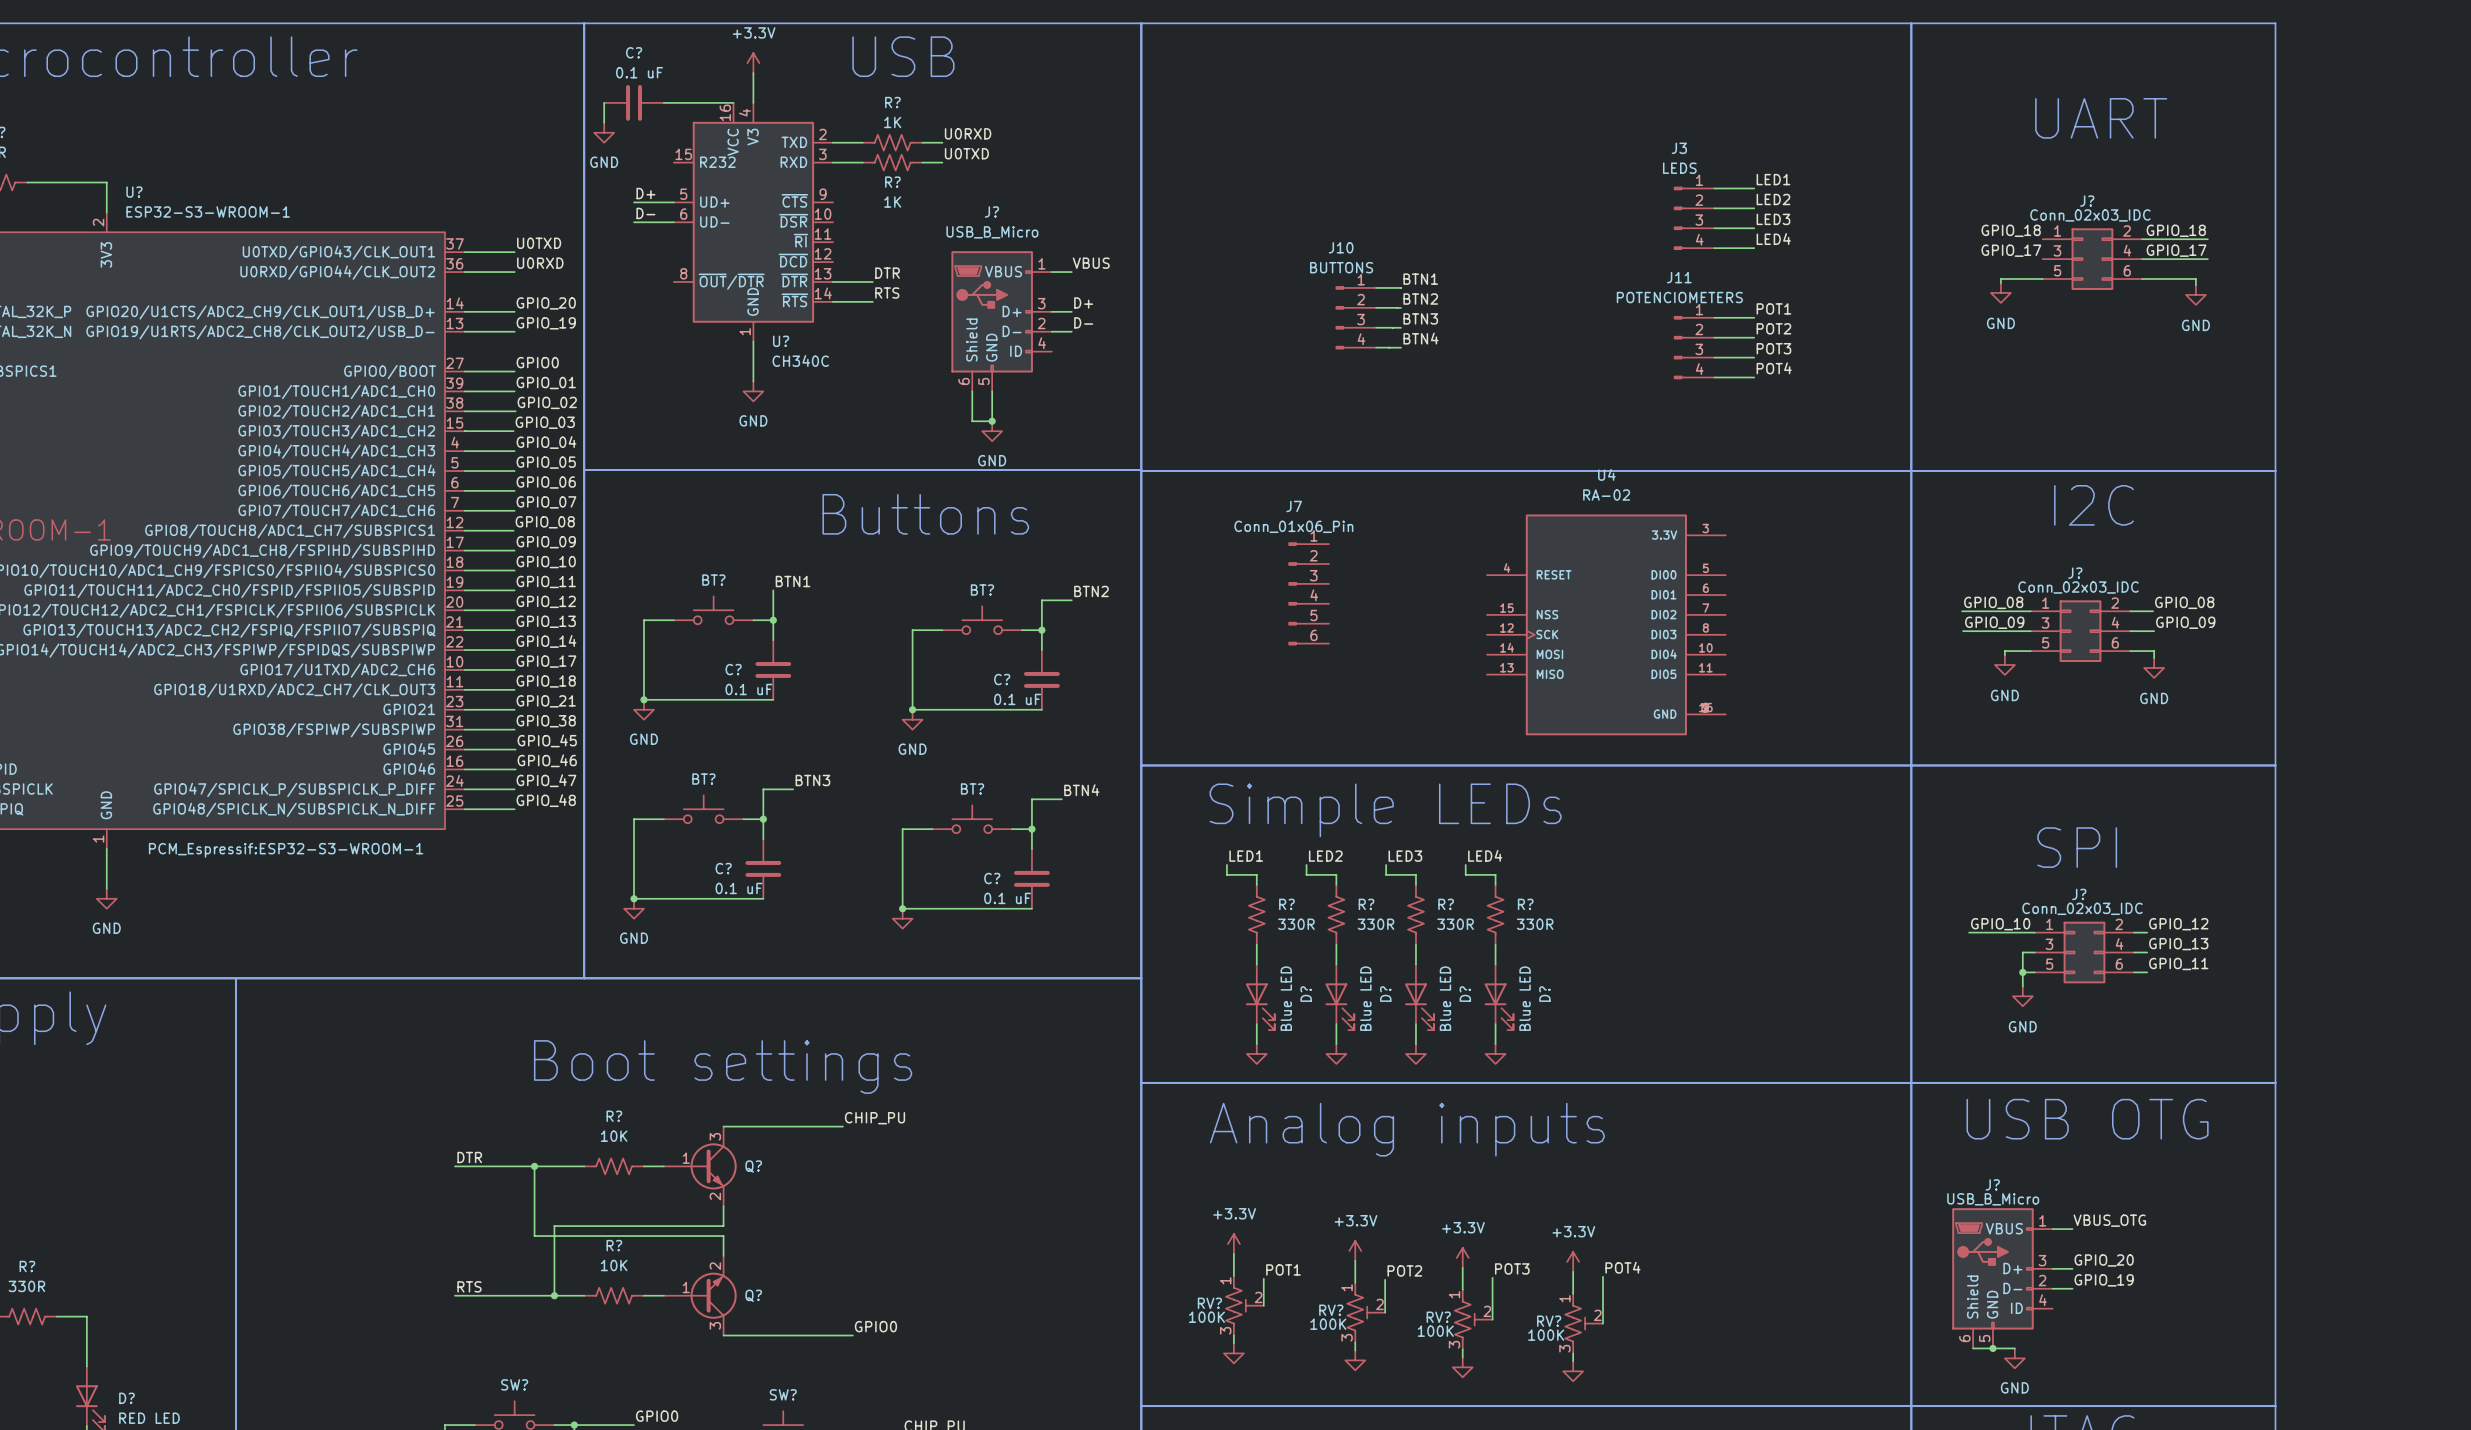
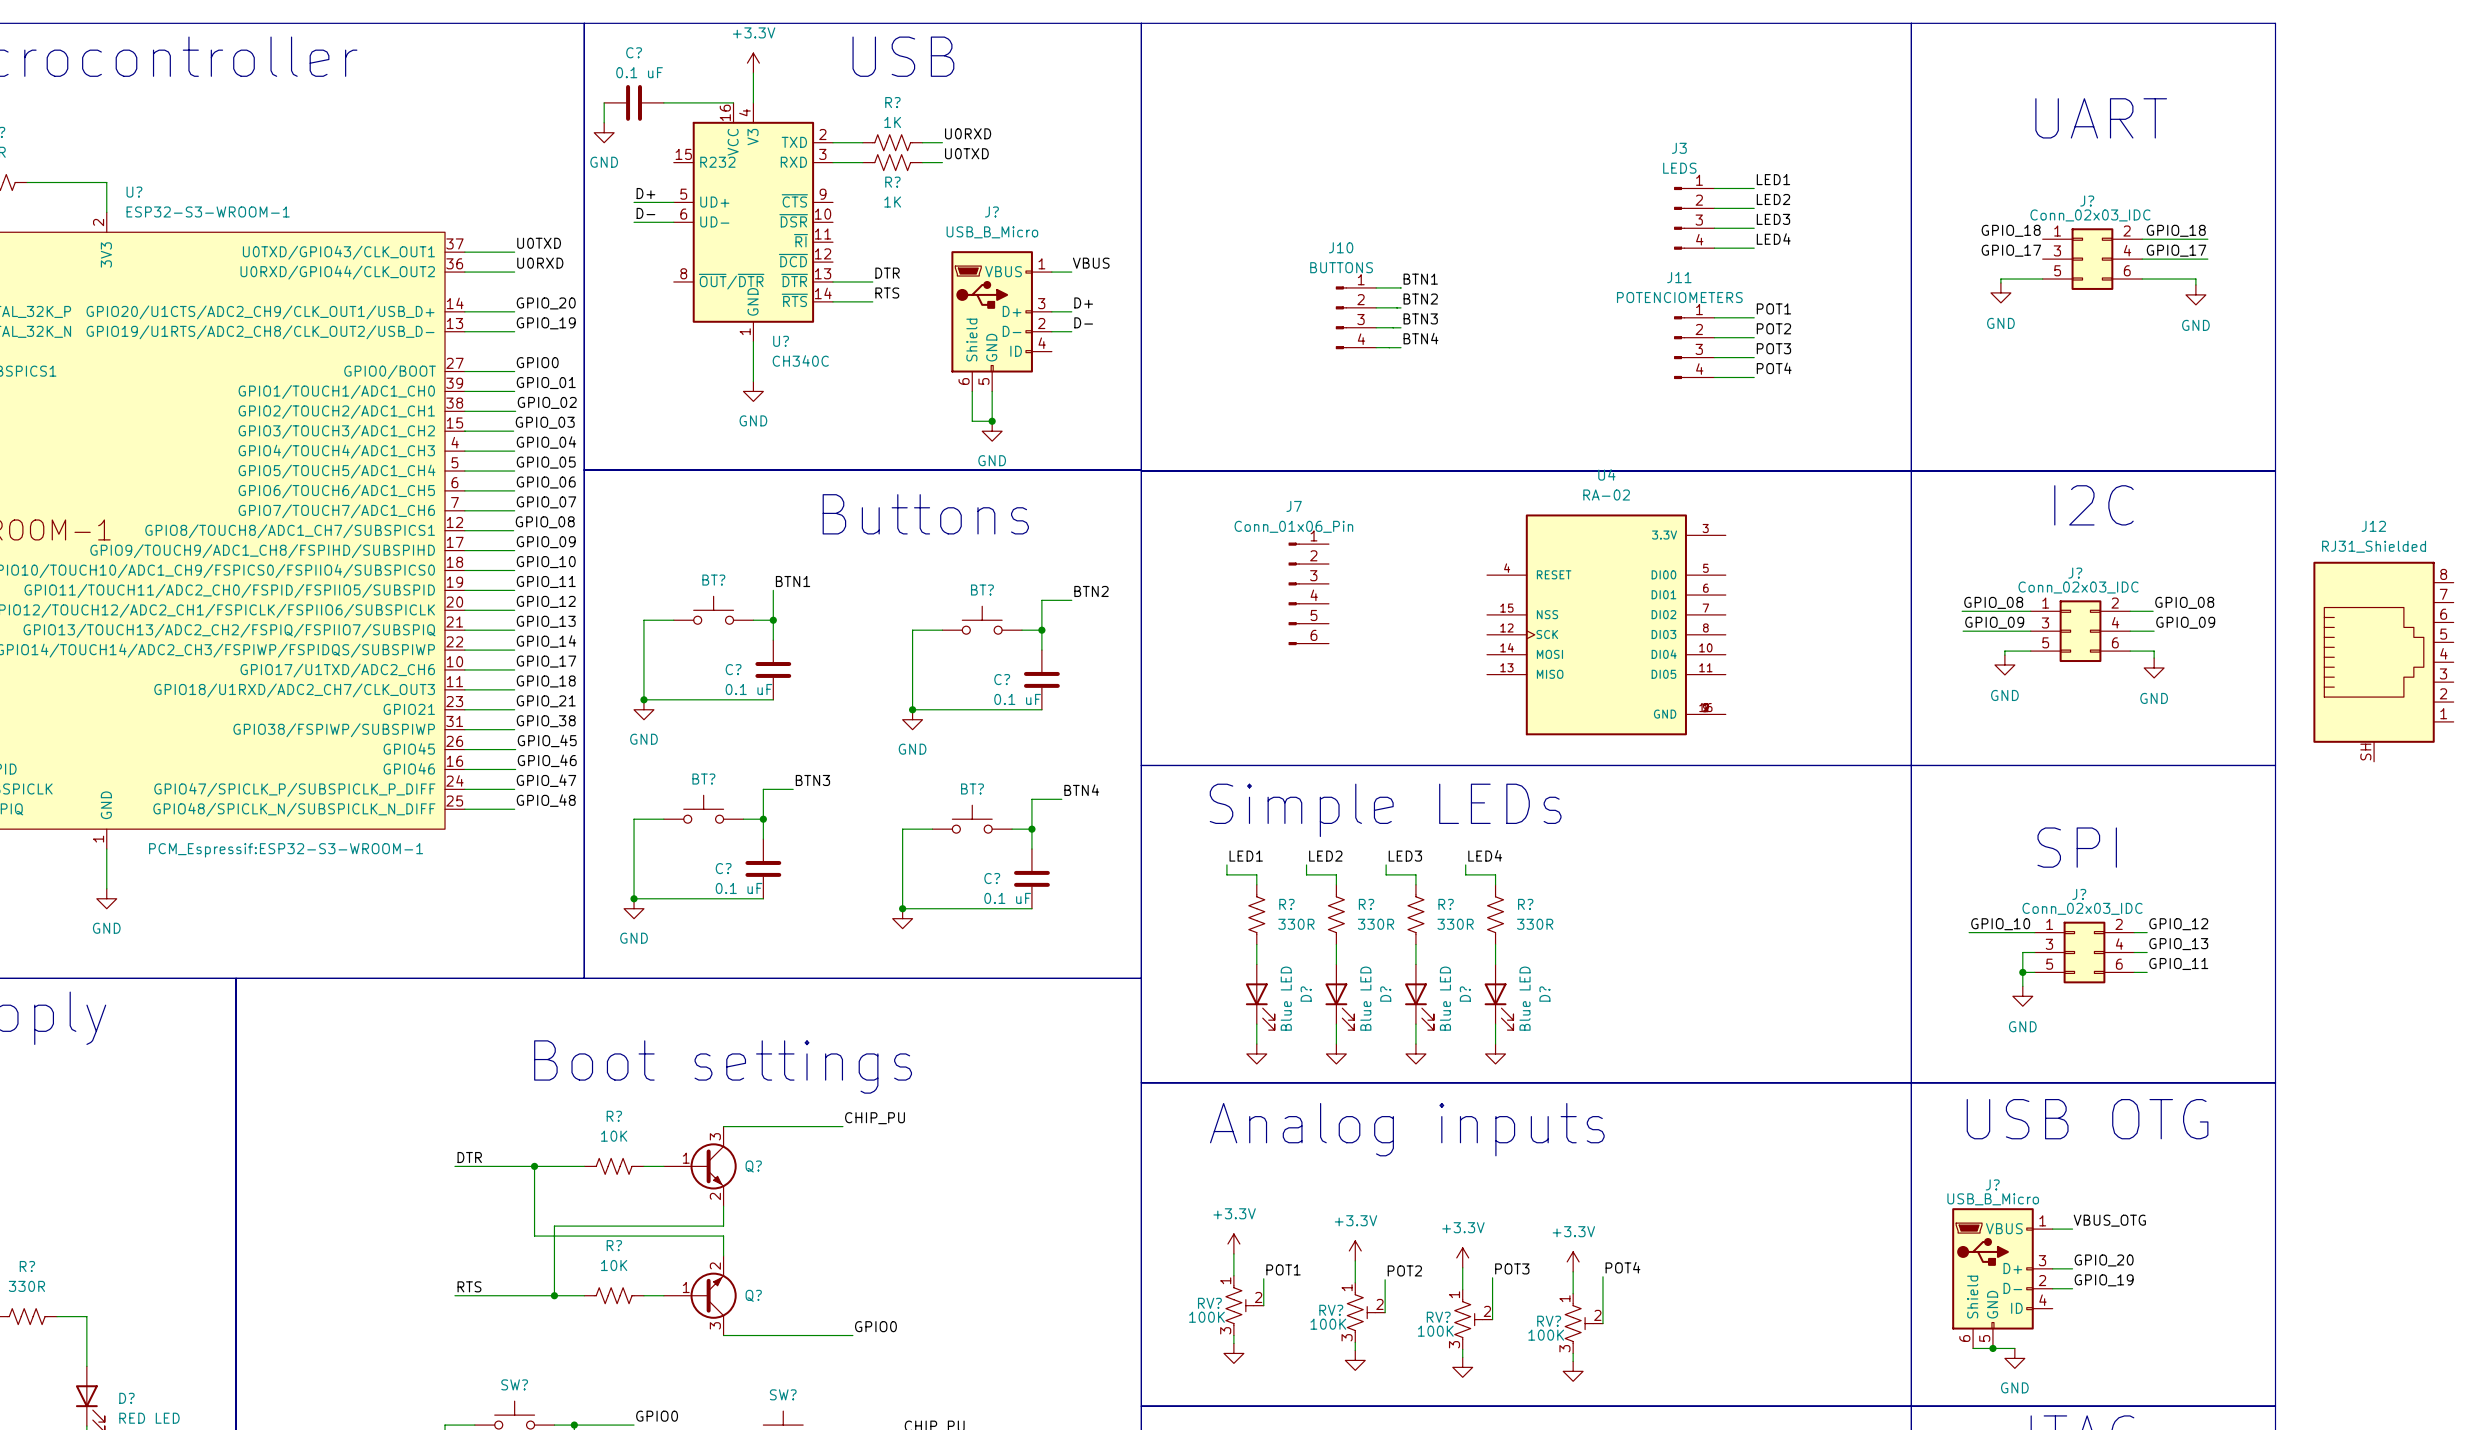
J12: none -> RJ31_Shielded (2383, 661)

